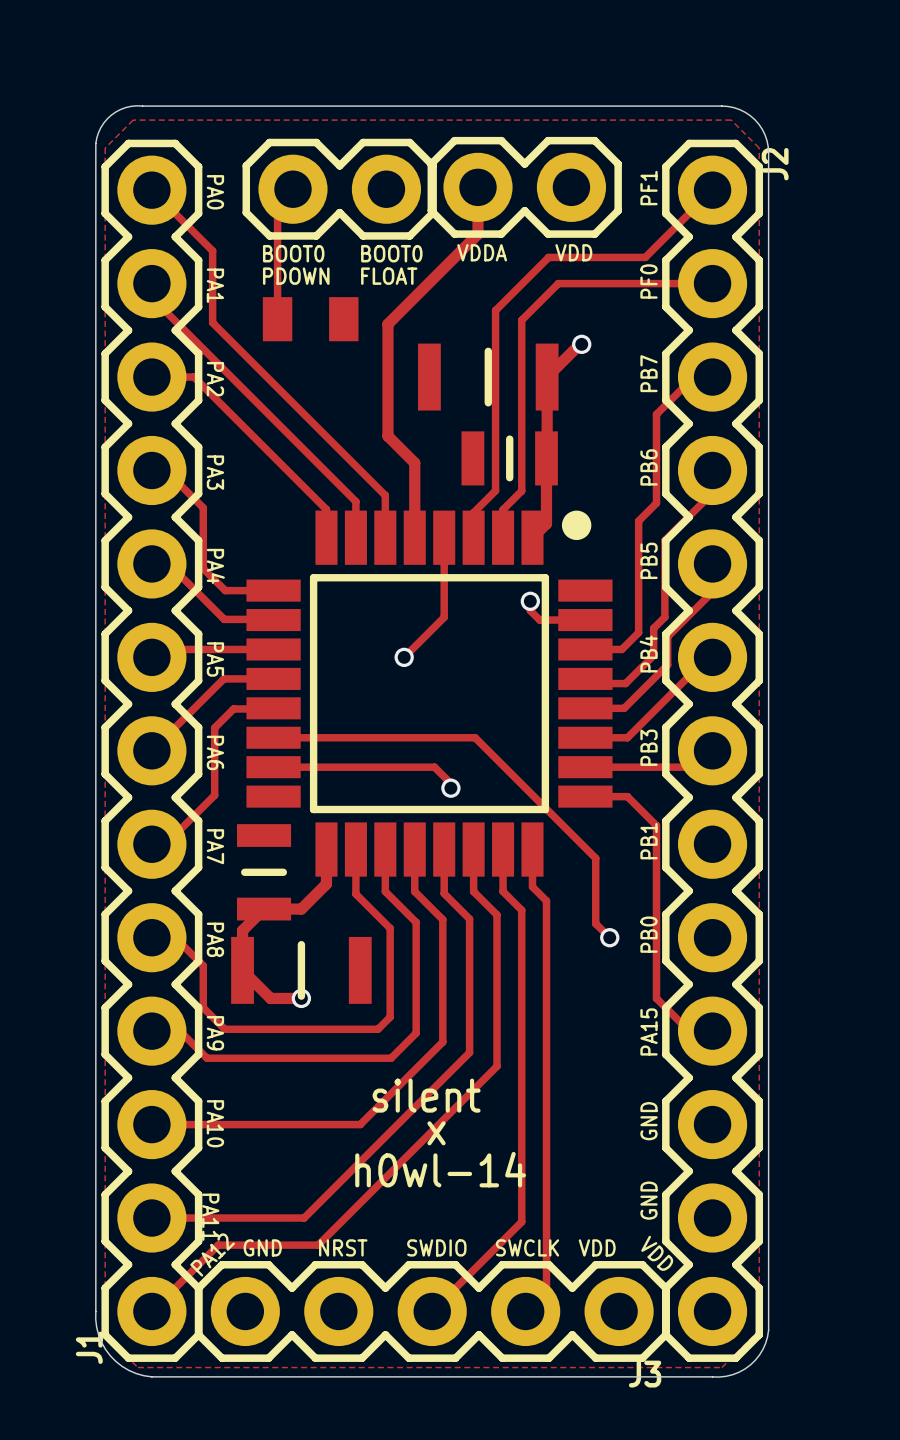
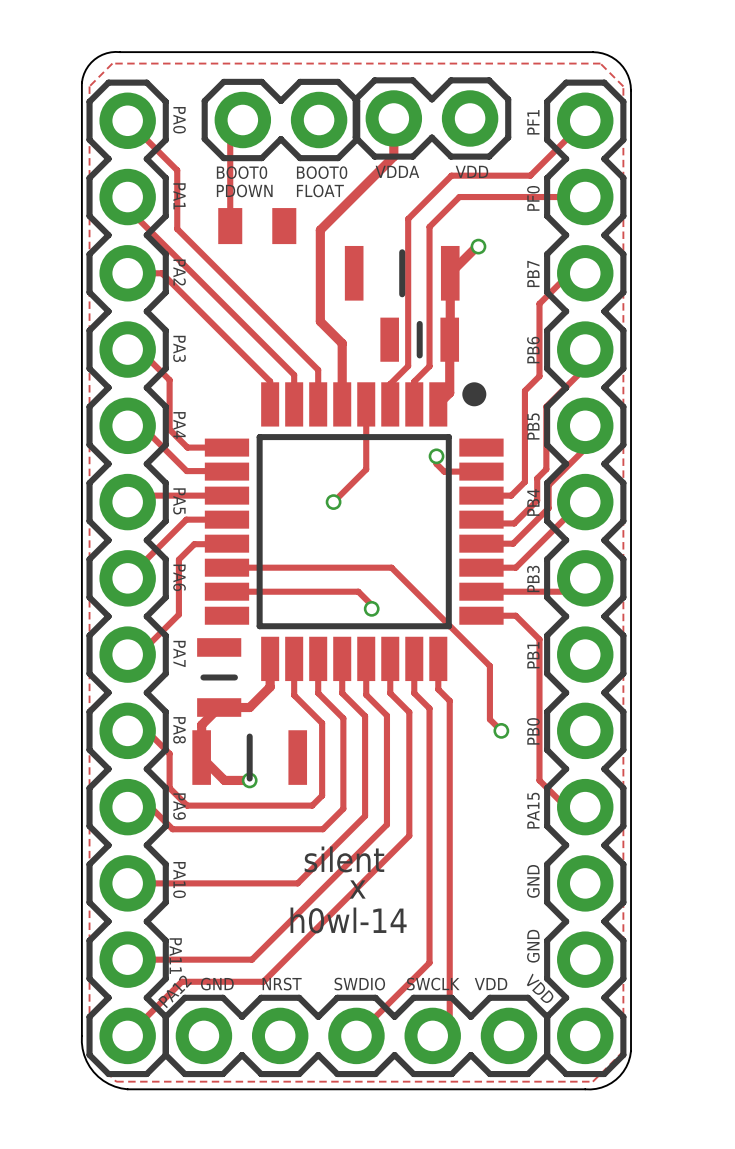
J2 name: J2 (775, 164) -> none
J1 name: J1 (89, 1347) -> none
J3 name: J3 (645, 1374) -> none

